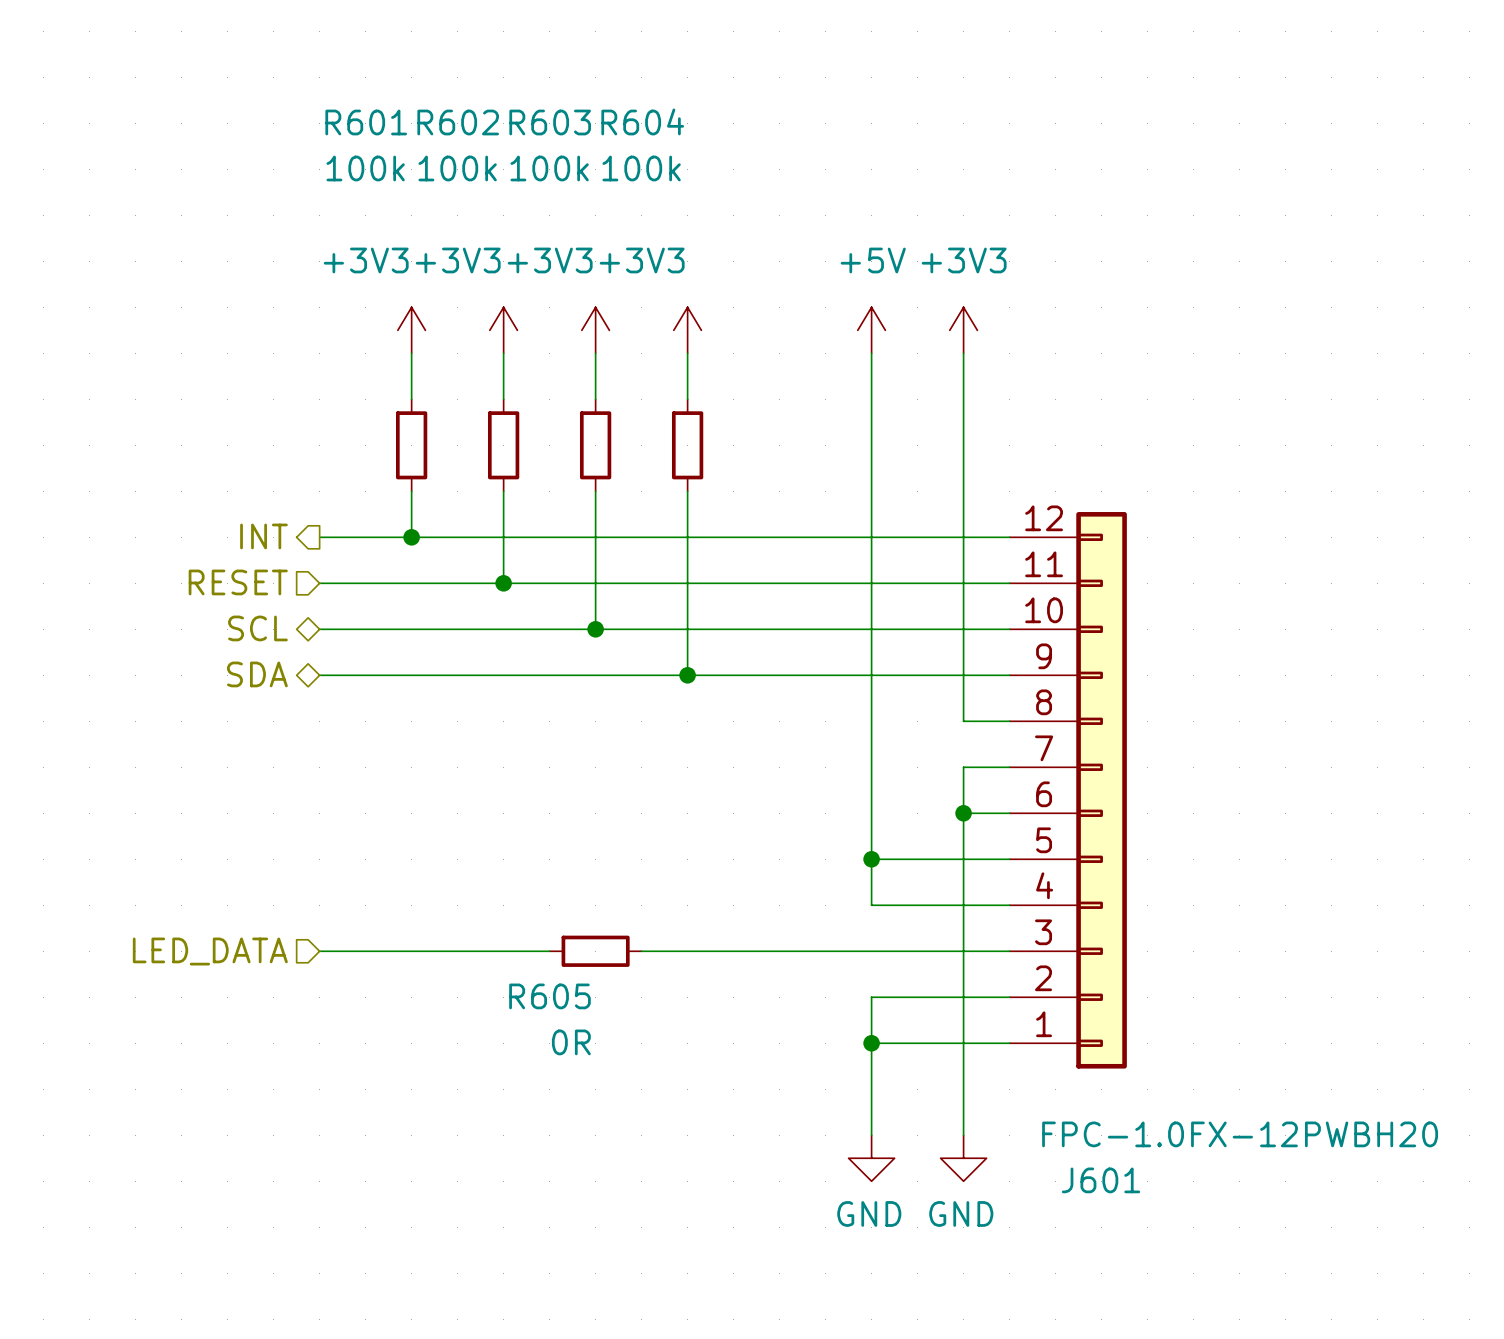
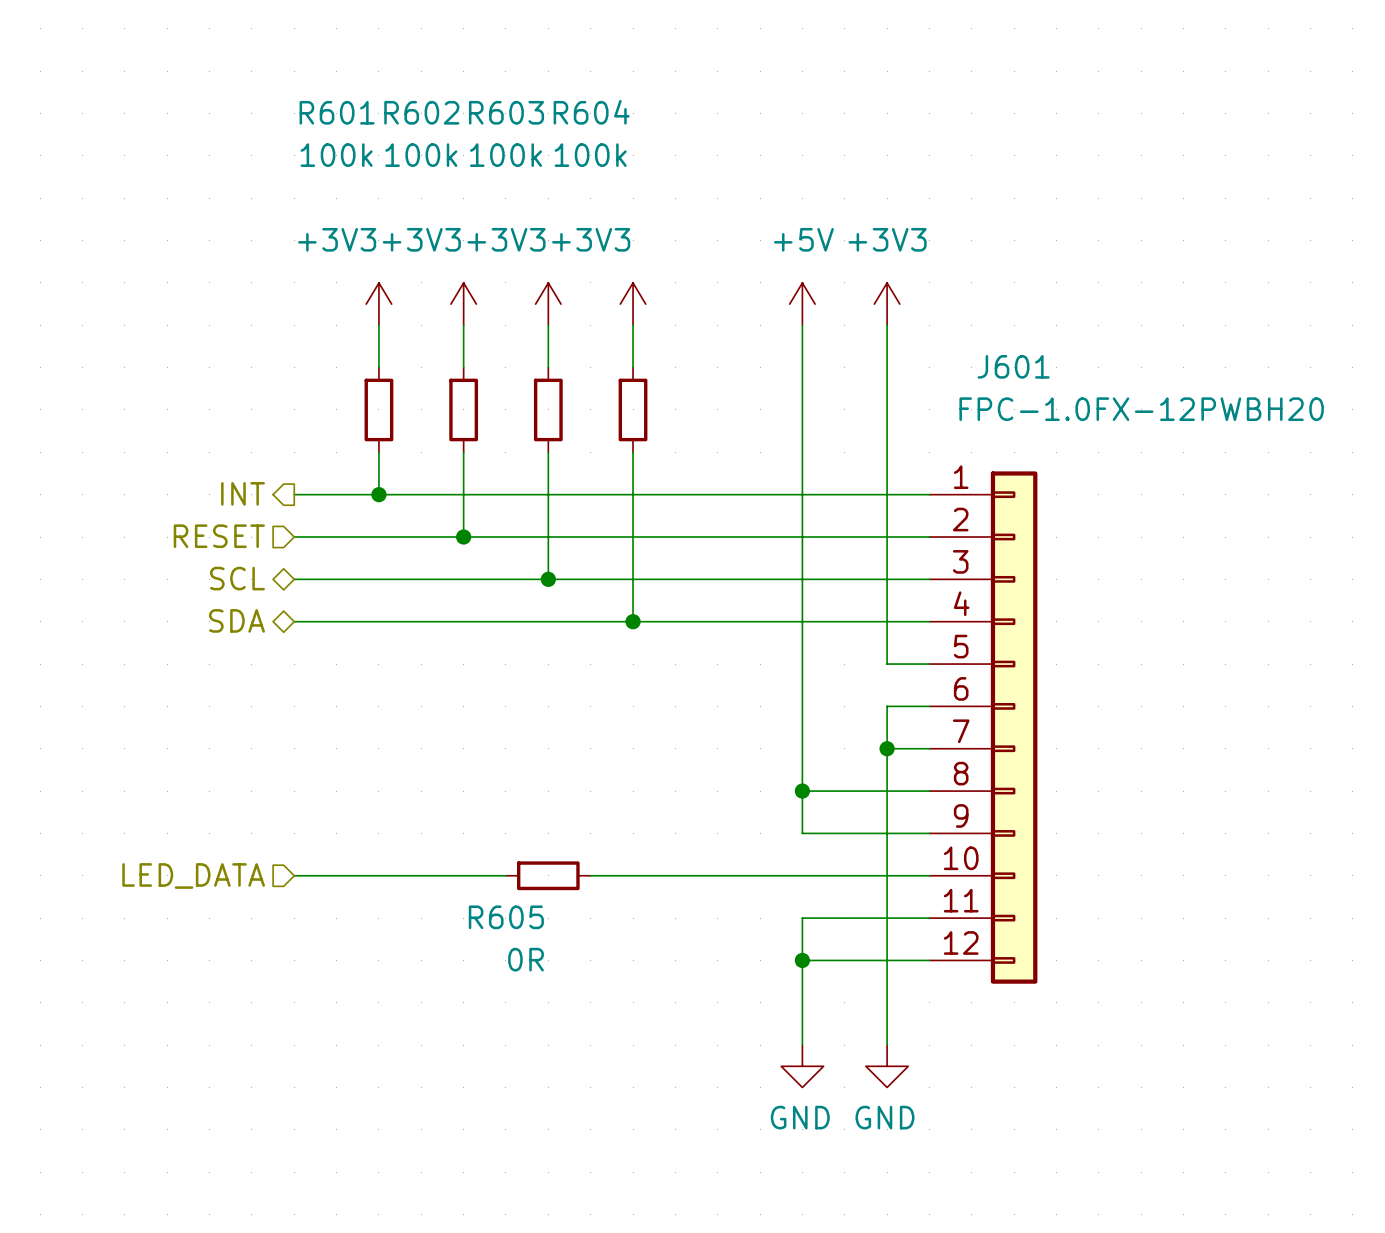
J601 flip: as is (1101, 790) -> up-down (1014, 727)

